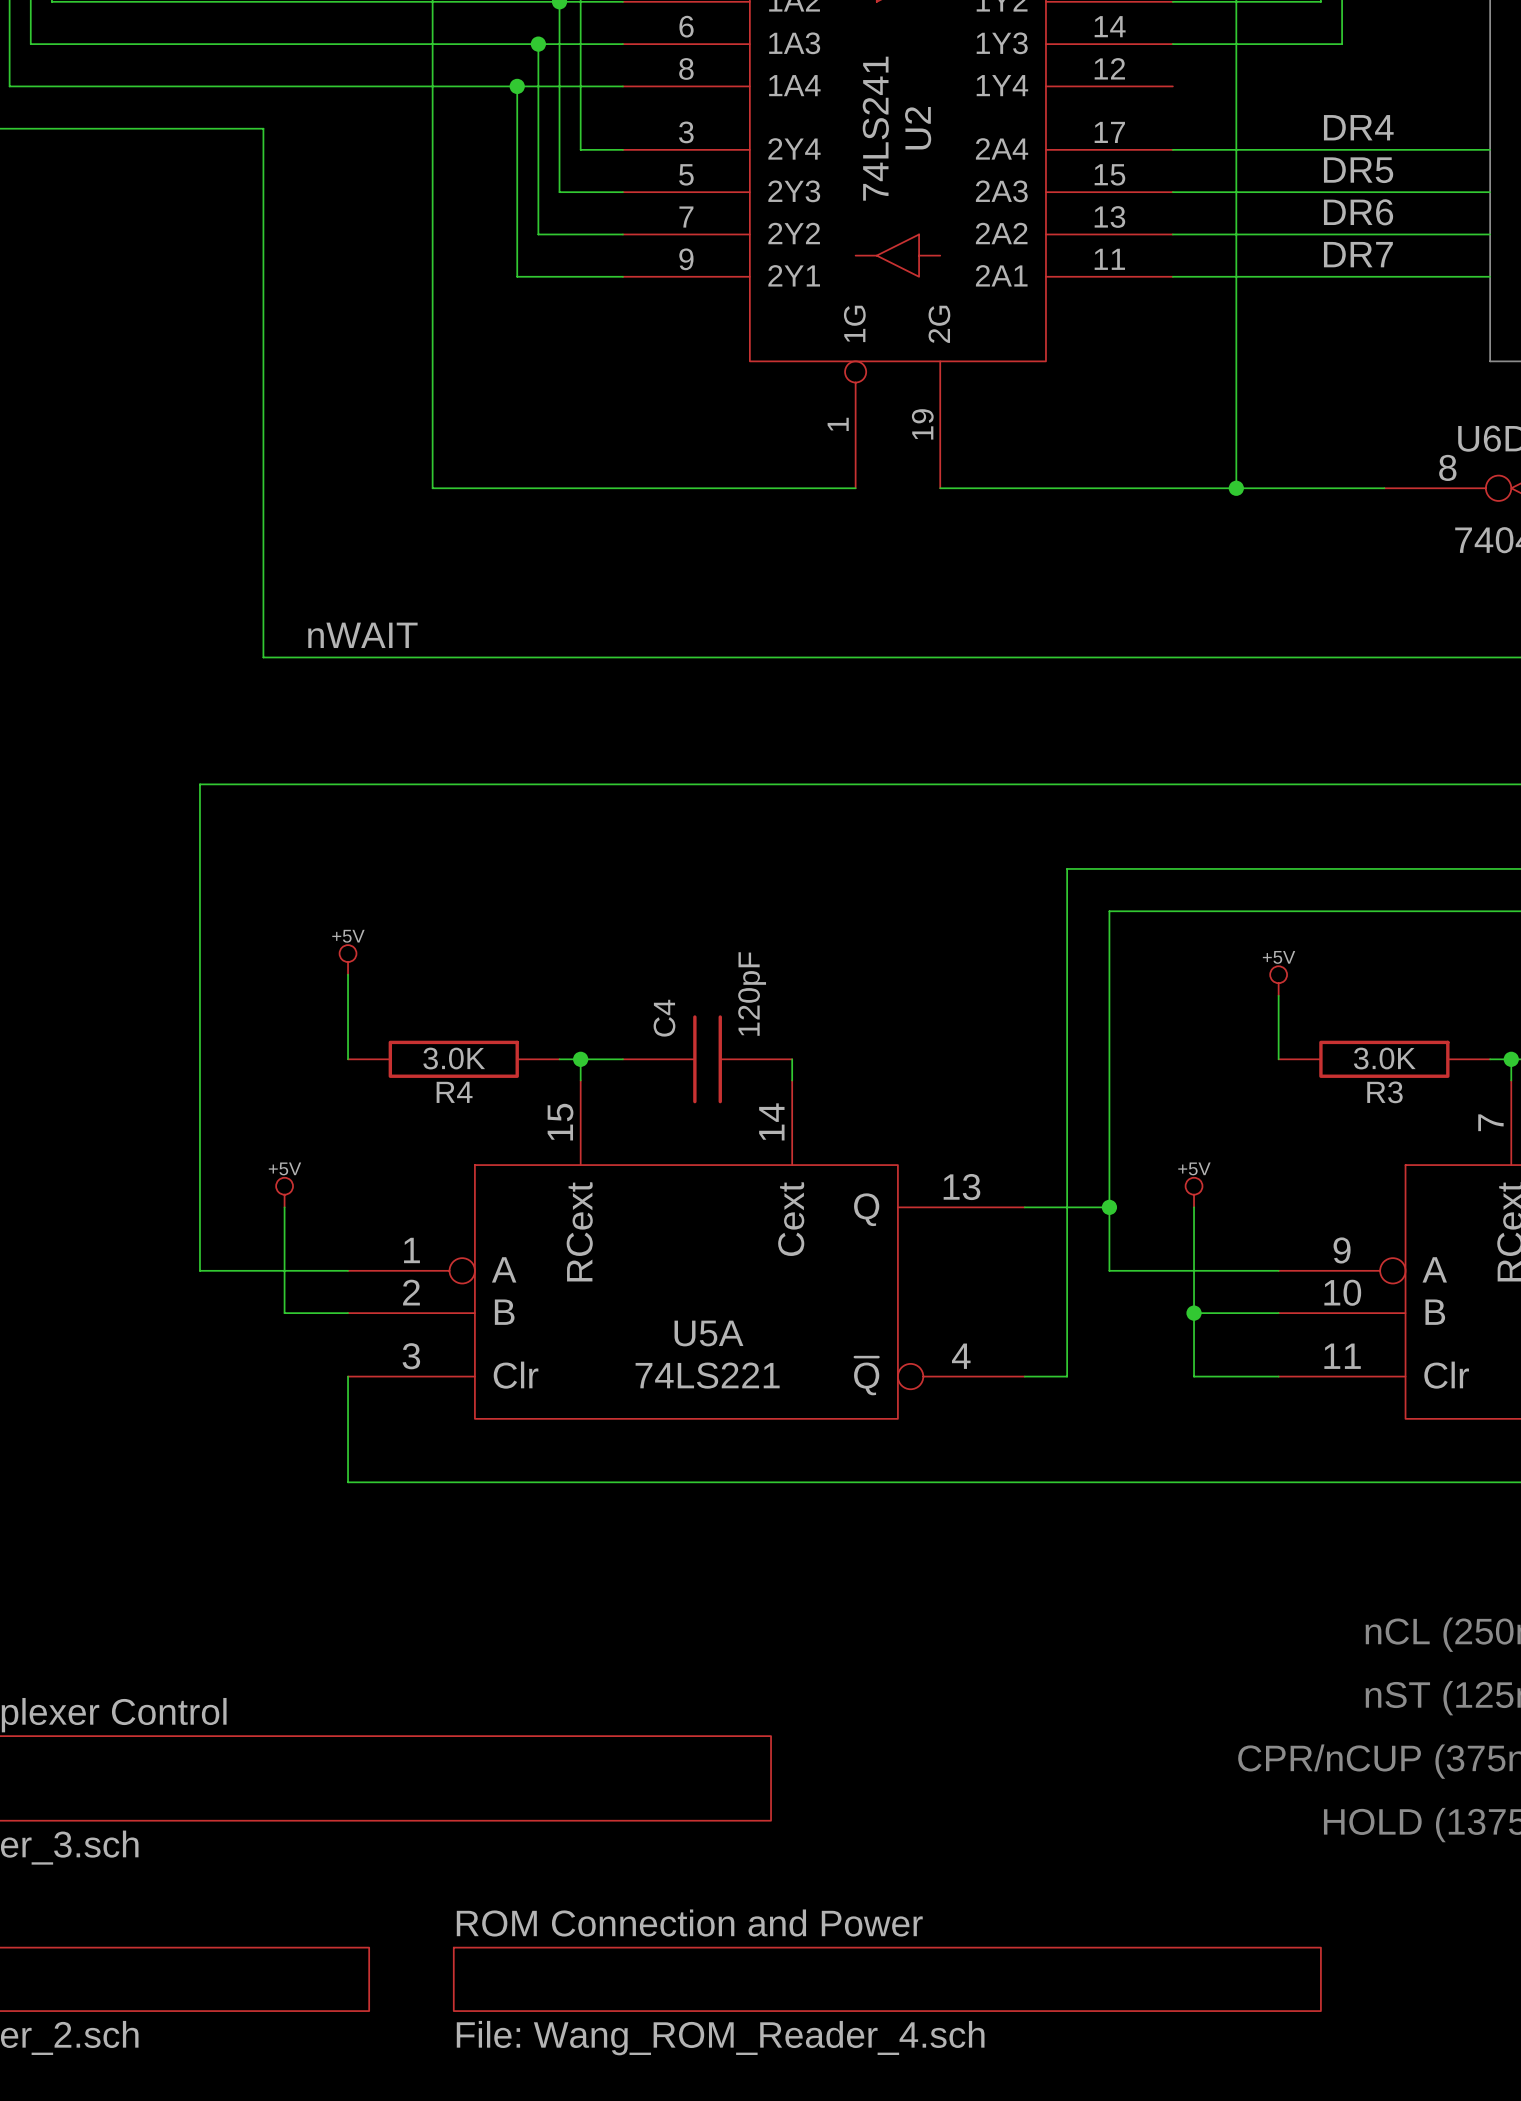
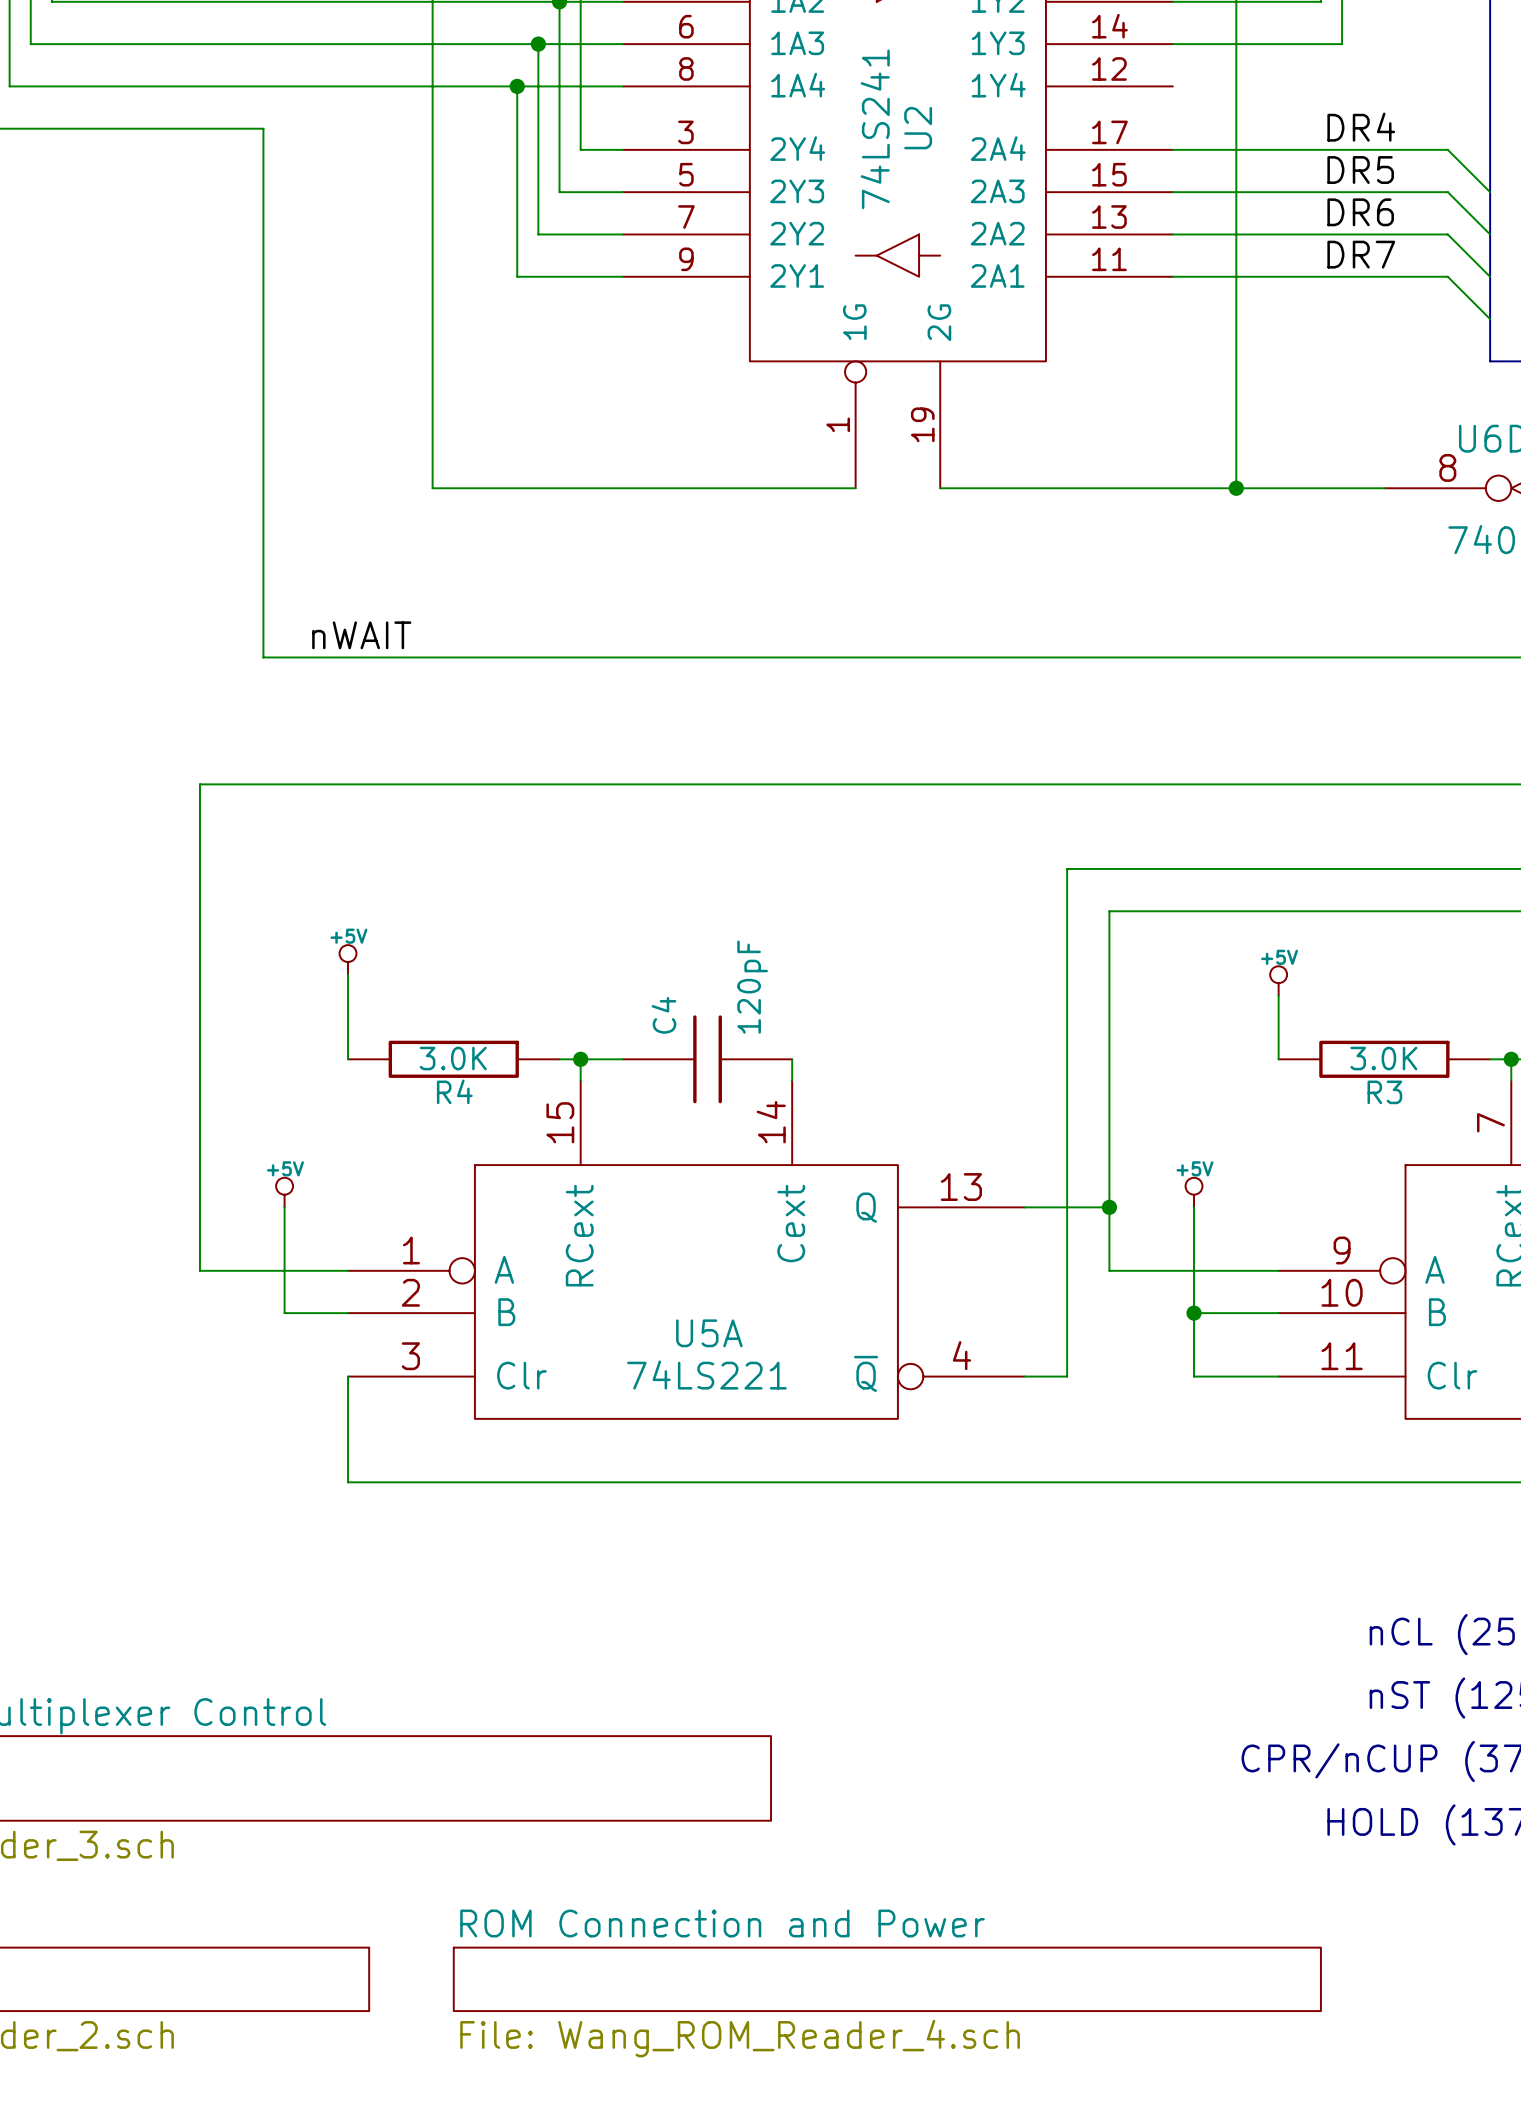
wire: (1447, 149) (1490, 149) -> (1447, 149) (1490, 192)
wire: (1447, 192) (1490, 192) -> (1447, 192) (1490, 234)
wire: (1447, 234) (1490, 234) -> (1447, 234) (1490, 276)
wire: (1447, 276) (1490, 276) -> (1447, 276) (1490, 319)

